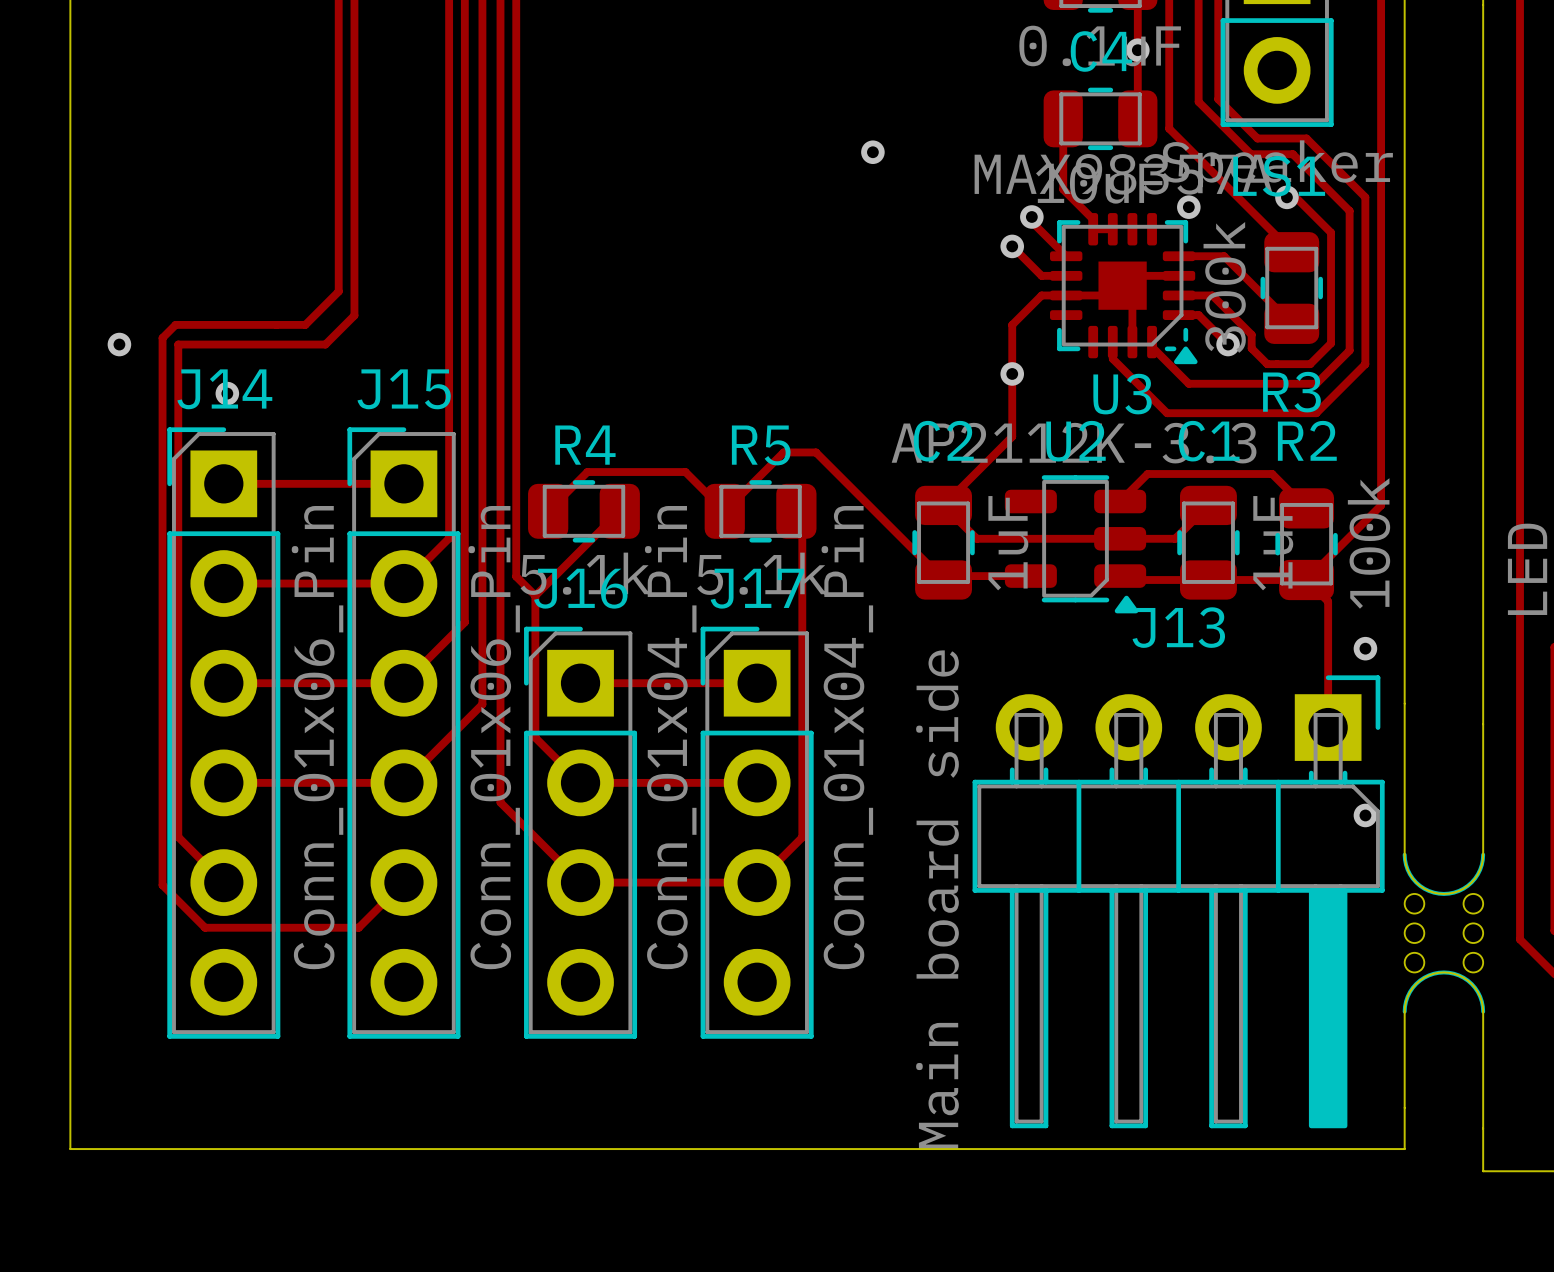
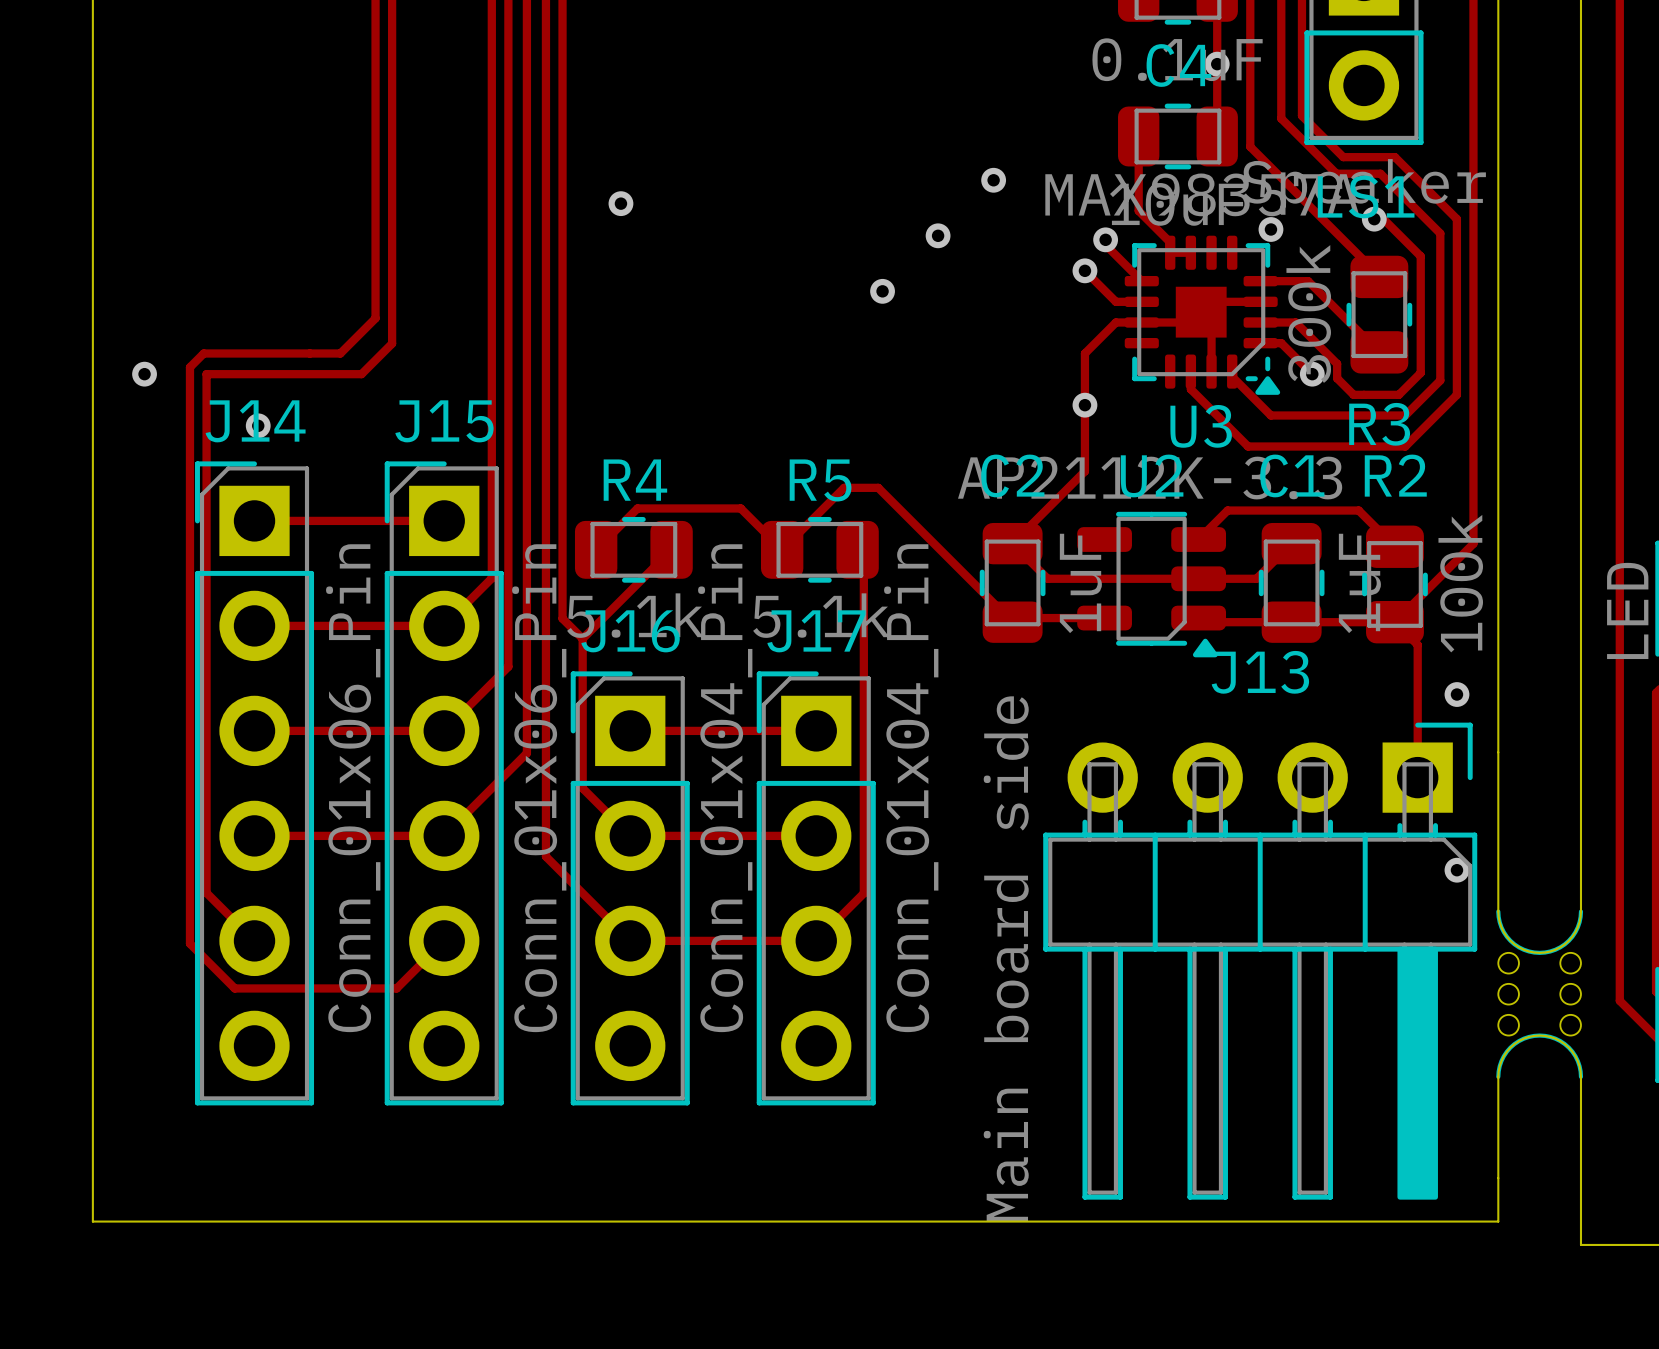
via: (872, 152) -> none
via: none -> (993, 180)
via: none -> (620, 203)
via: none -> (938, 235)
via: none -> (882, 291)

